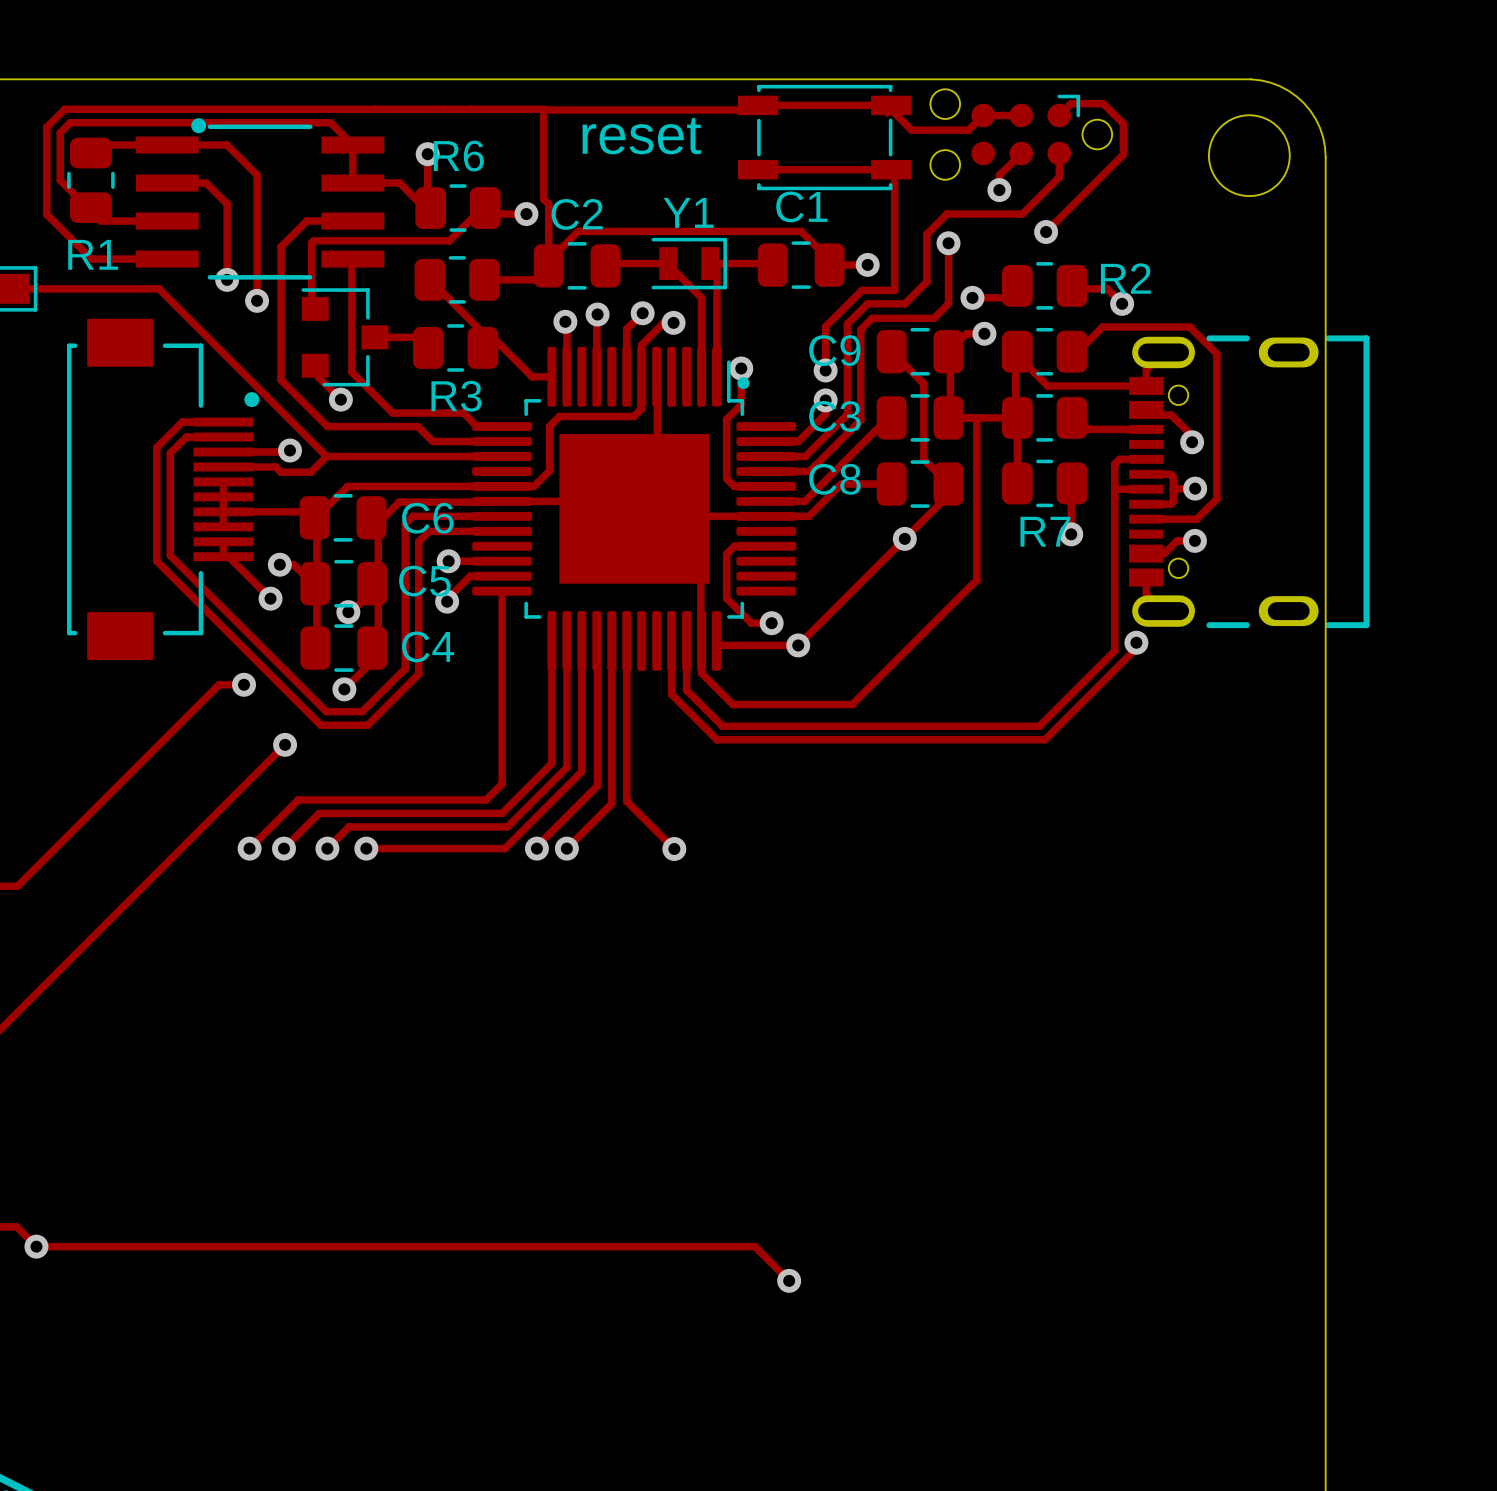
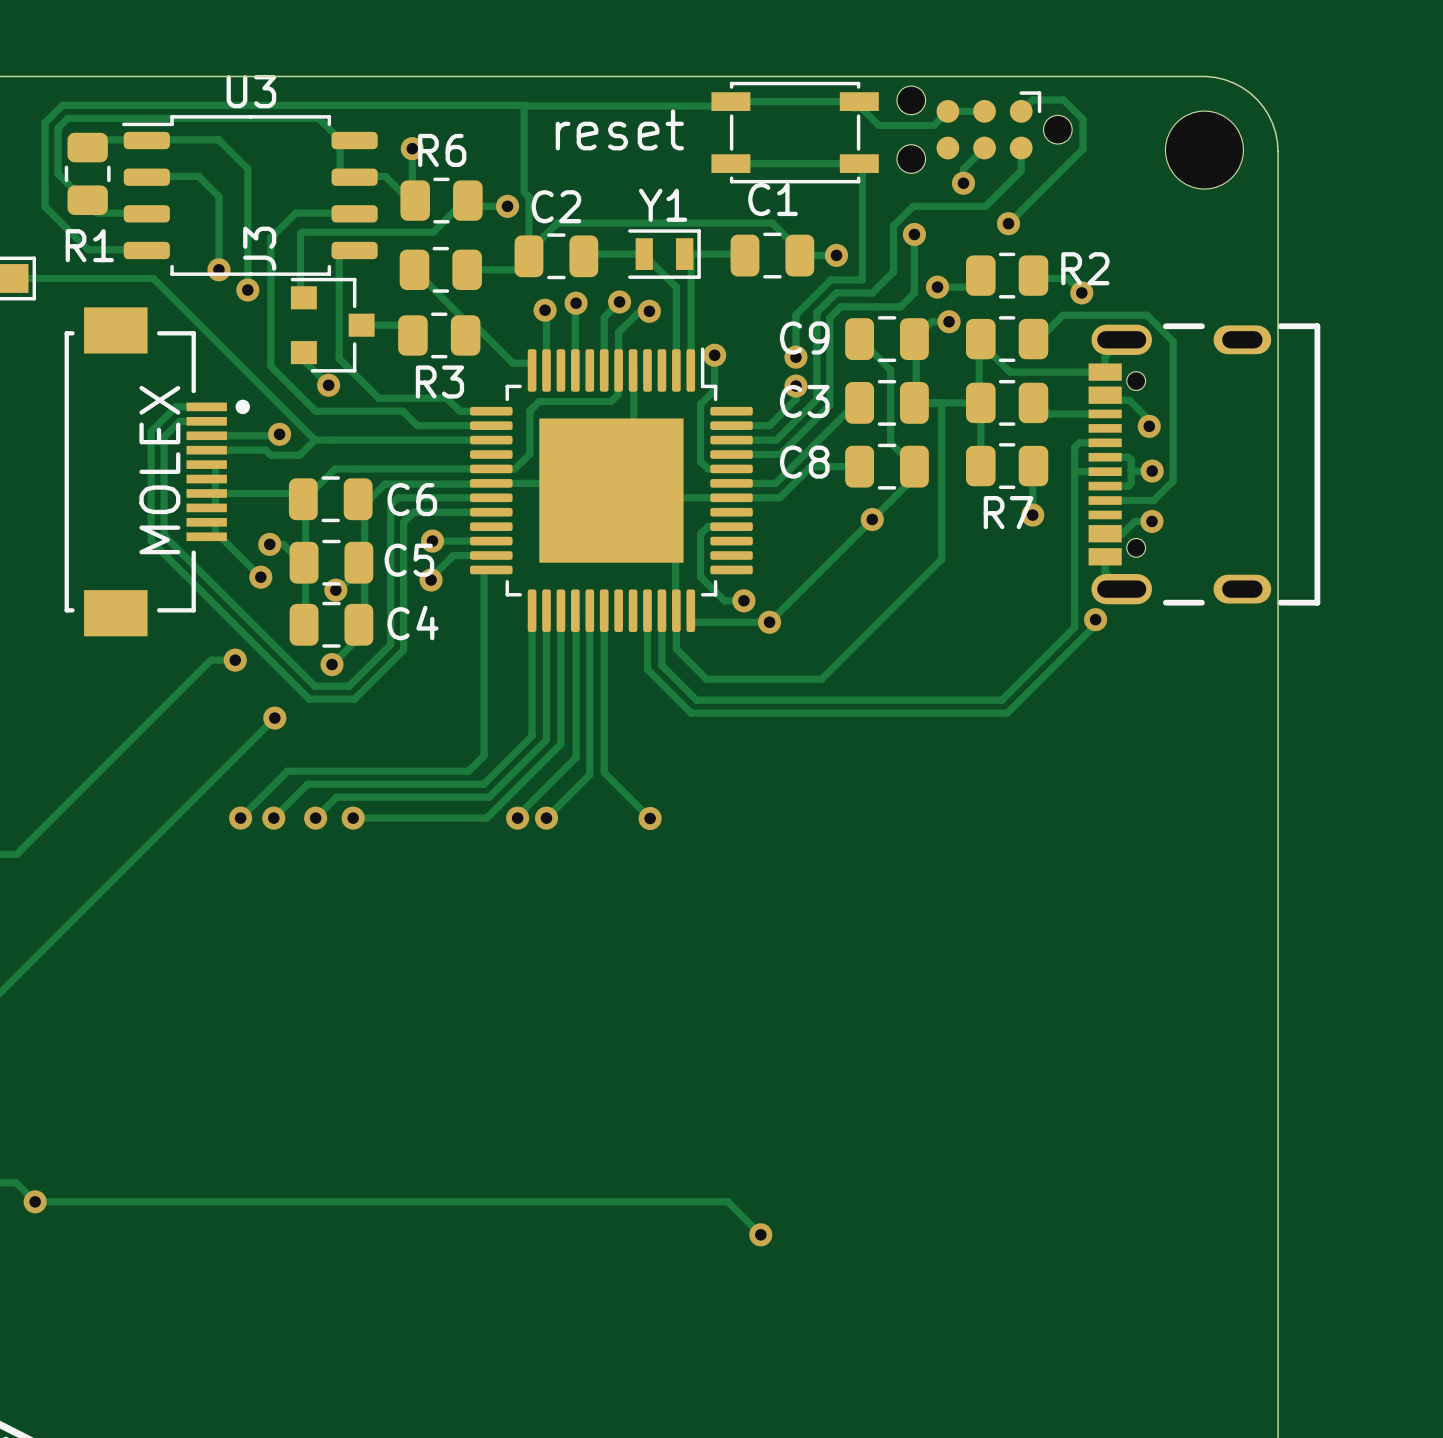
part: (260, 198) -> none
U3: none -> (249, 195)
part footprint: [472, 346, 797, 671] -> [470, 347, 753, 632]
part: (163, 489) -> none
J3: none -> MOLEX (157, 471)

